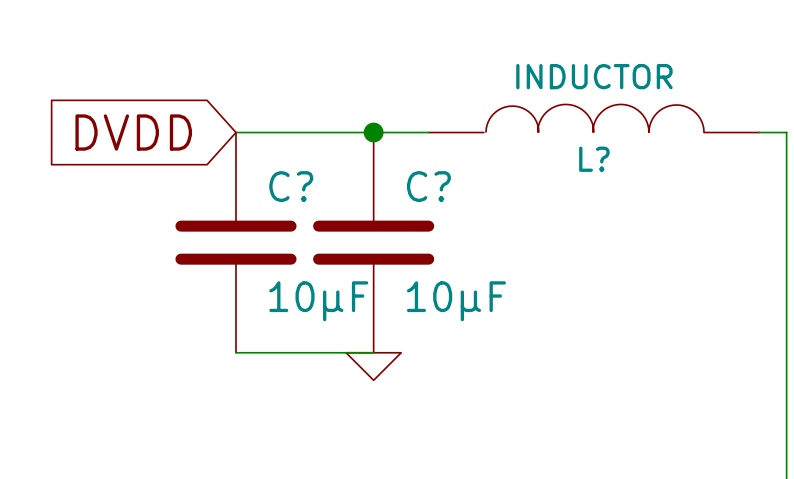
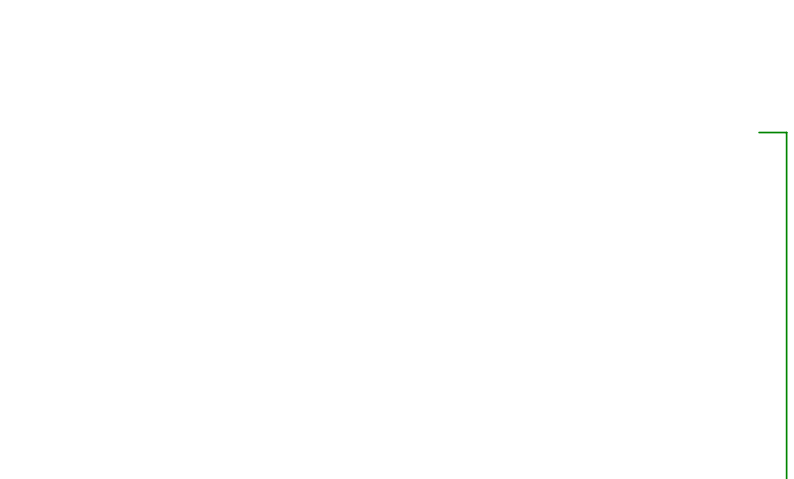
L?: INDUCTOR (593, 118) -> none
global label: DVDD (133, 132) -> none
wire: (235, 132) (428, 132) -> none
junction: (373, 132) -> none
C?: 10µF (235, 242) -> none
C?: 10µF (373, 242) -> none
wire: (235, 352) (373, 352) -> none
power symbol: (373, 366) -> none

